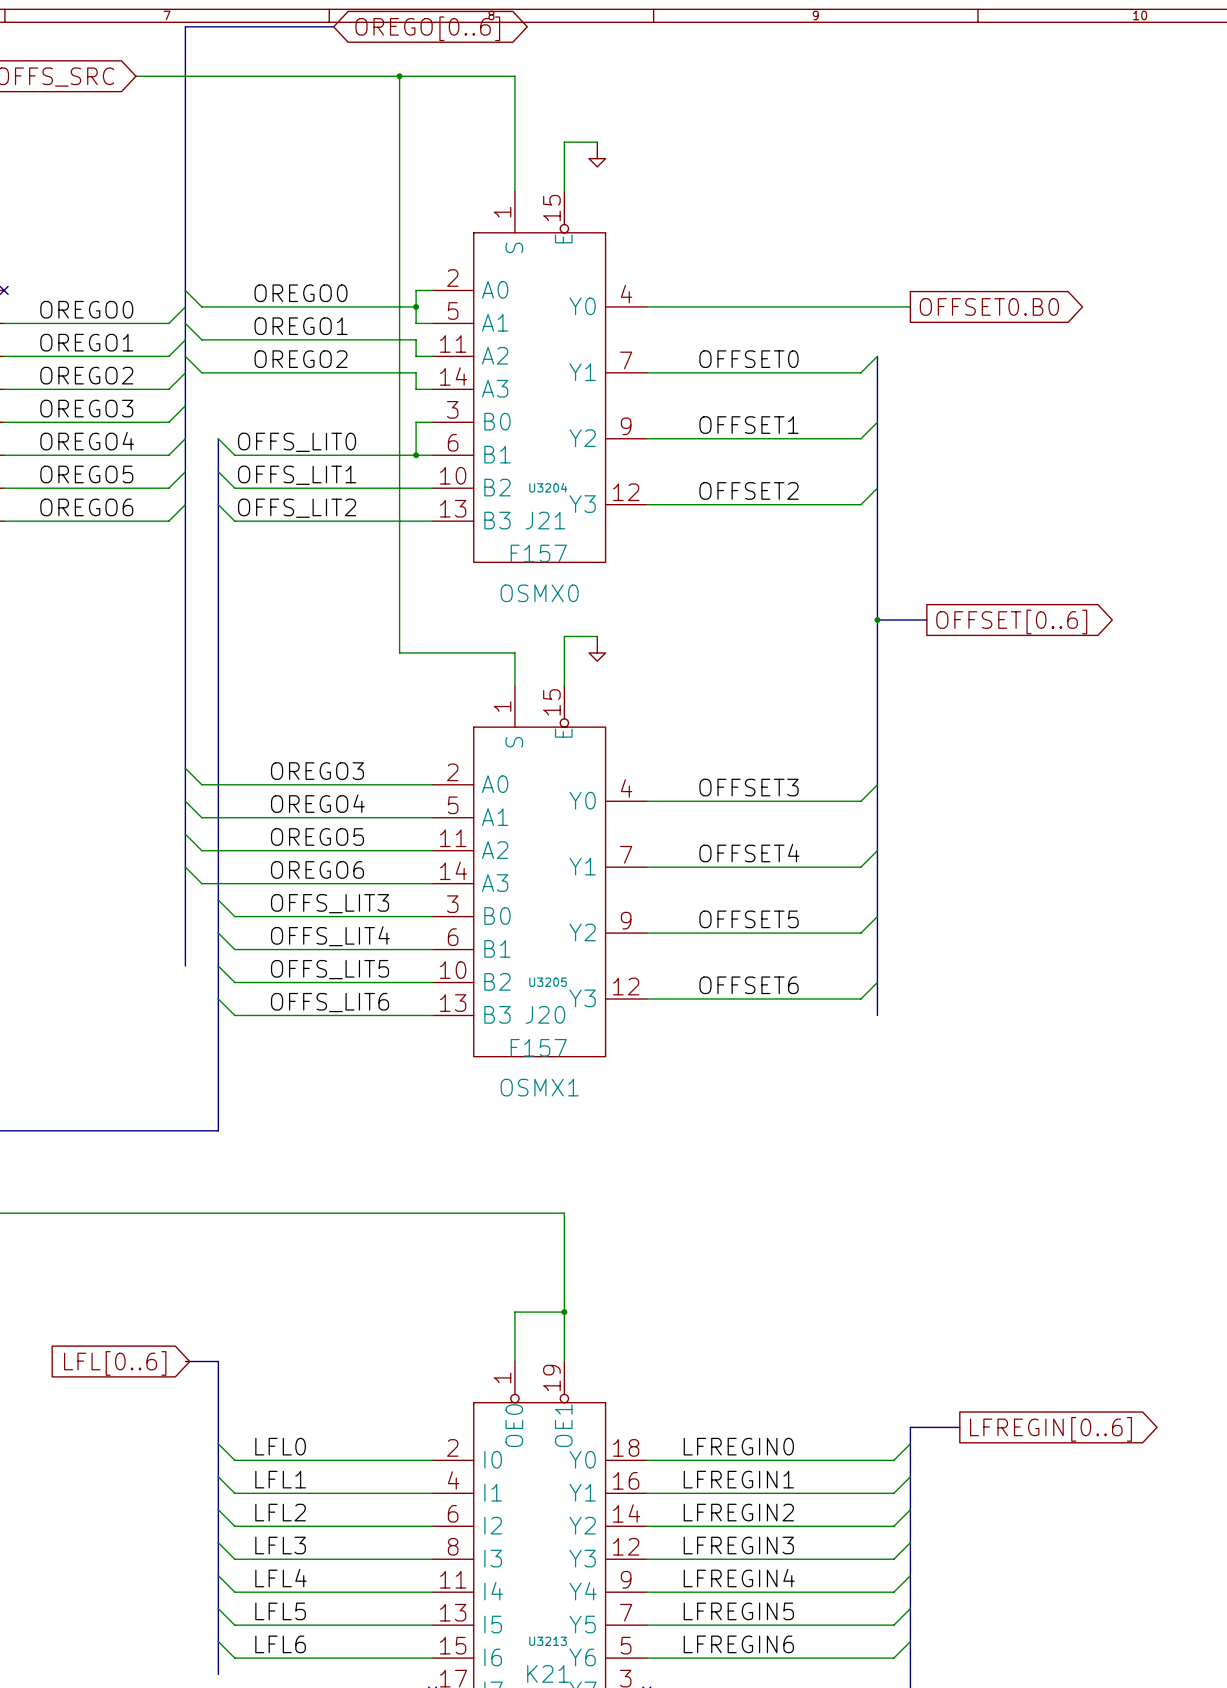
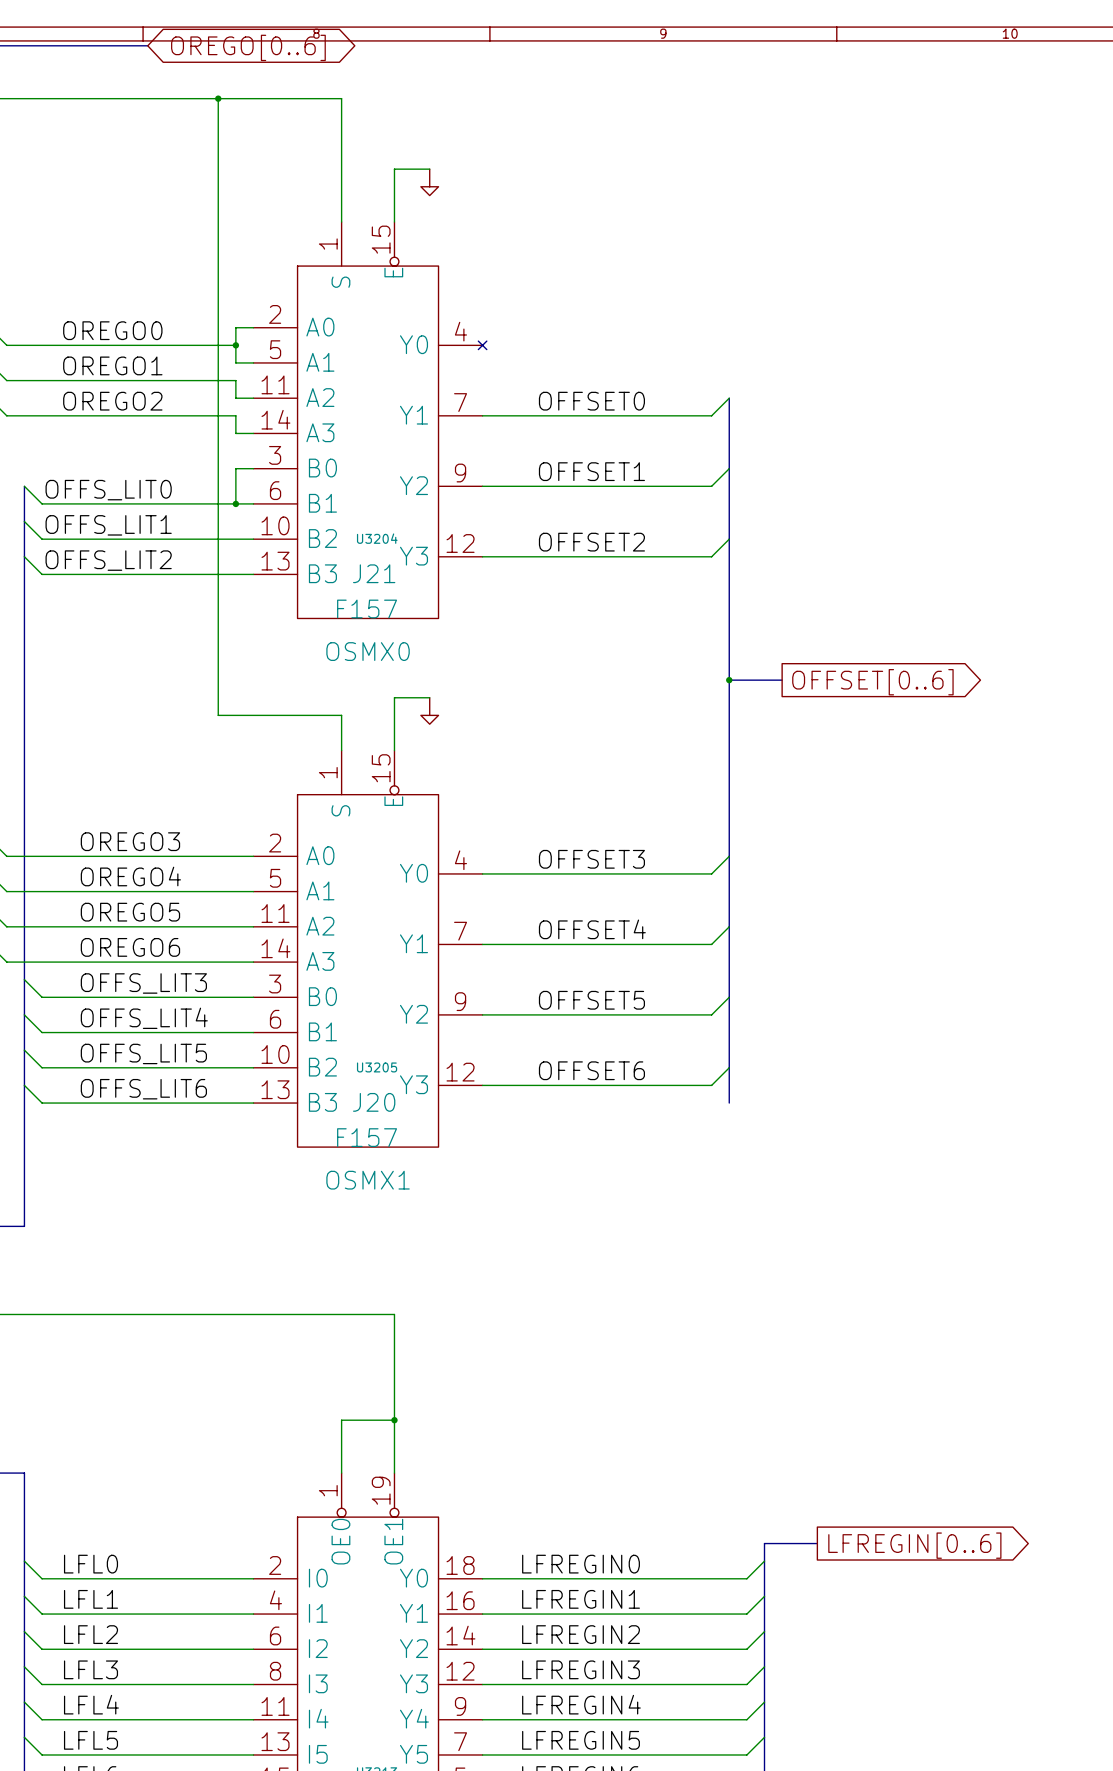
wire: (646, 306) (910, 306) -> none
no-connect mark: none -> (482, 345)
global label: OFFSET0.B0 (989, 306) -> none

